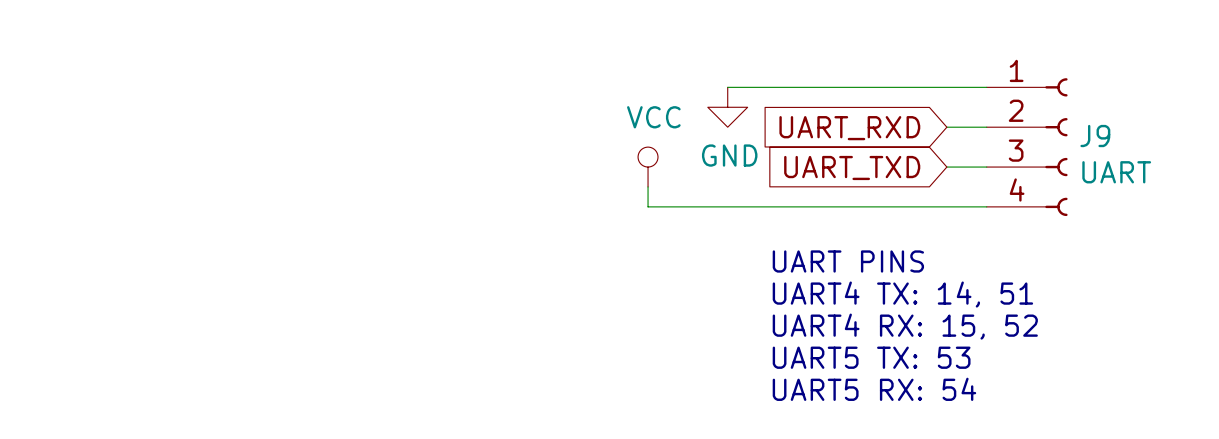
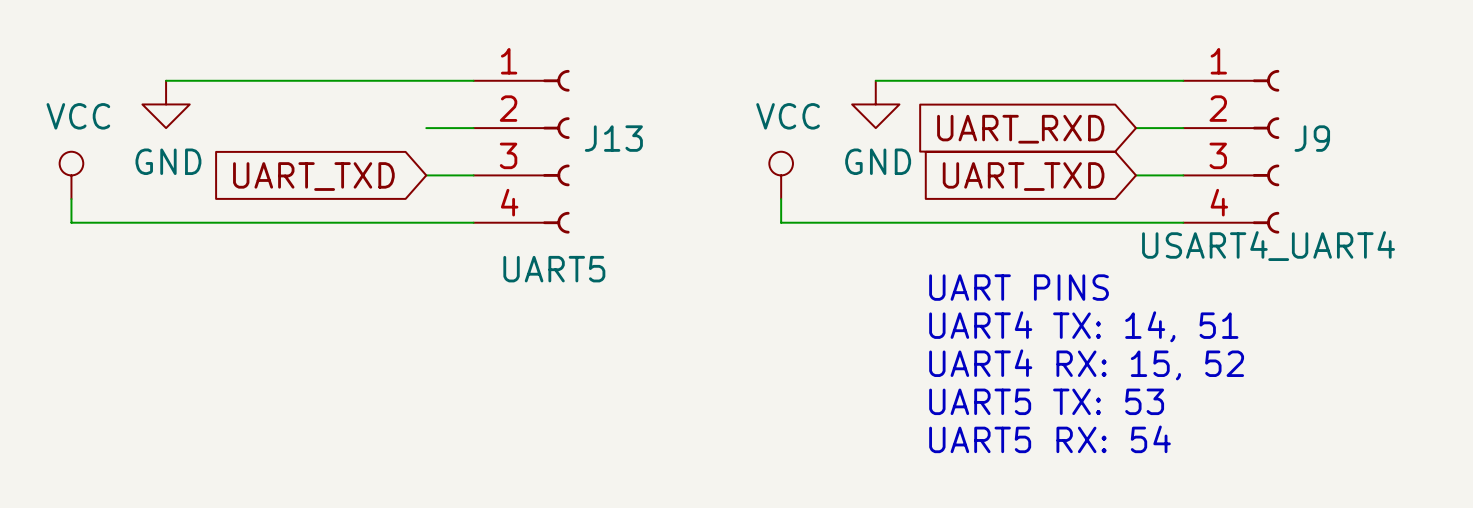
wire: none -> (166, 80) (473, 80)
power symbol: none -> GND (166, 104)
wire: none -> (426, 128) (473, 128)
J13: none -> UART5 (521, 151)
power symbol: none -> VCC (71, 175)
global label: none -> UART_TXD (313, 176)
wire: none -> (426, 175) (473, 175)
J9 value: UART (1116, 172) -> USART4_UART4 (1268, 246)
wire: none -> (71, 199) (71, 222) (473, 222)

